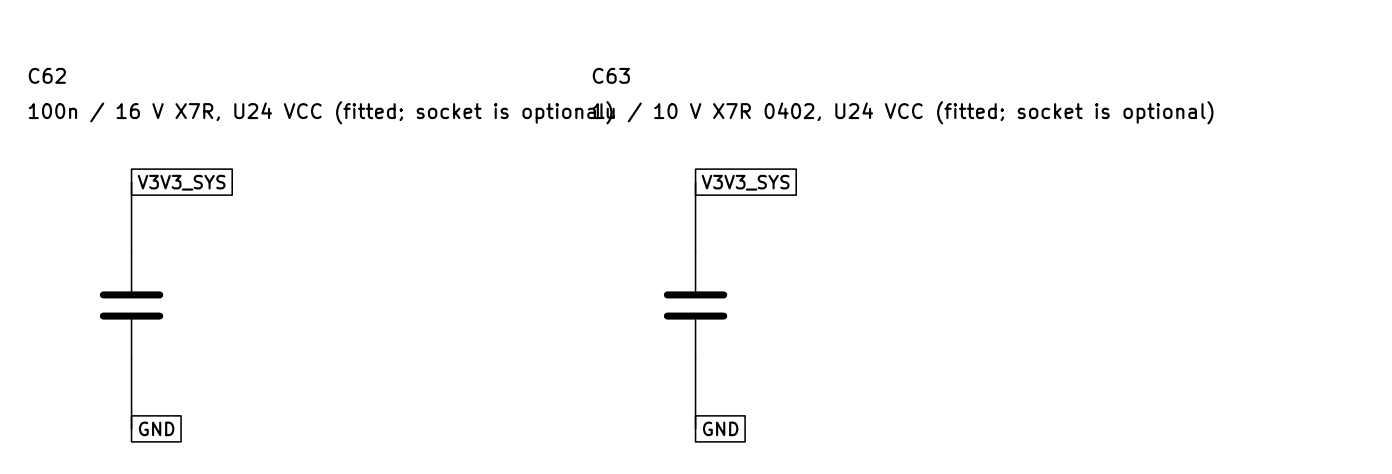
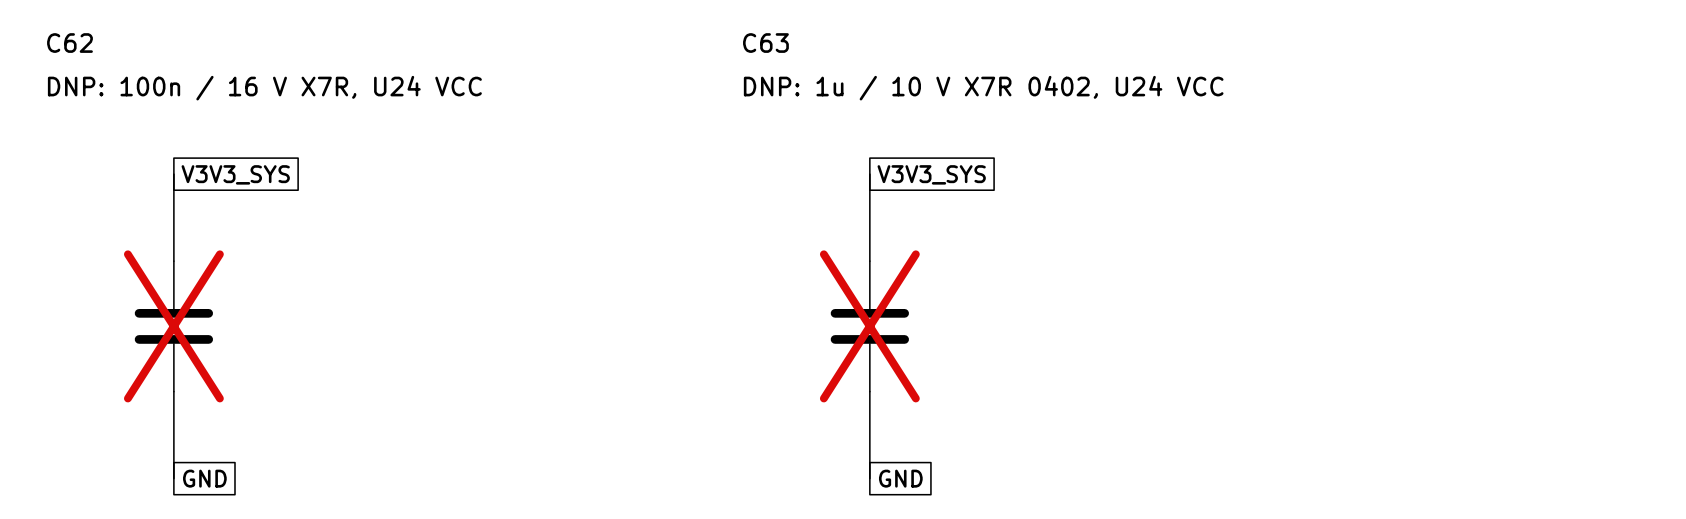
C62 value: 100n / 16 V X7R, U24 VCC (fitted; socket is optional) (320, 112) -> DNP: 100n / 16 V X7R, U24 VCC (264, 88)
C63 value: 1u / 10 V X7R 0402, U24 VCC (fitted; socket is optional) (903, 112) -> DNP: 1u / 10 V X7R 0402, U24 VCC (983, 88)
C62 do-not-place cross: none -> (173, 326)
C63 do-not-place cross: none -> (869, 326)

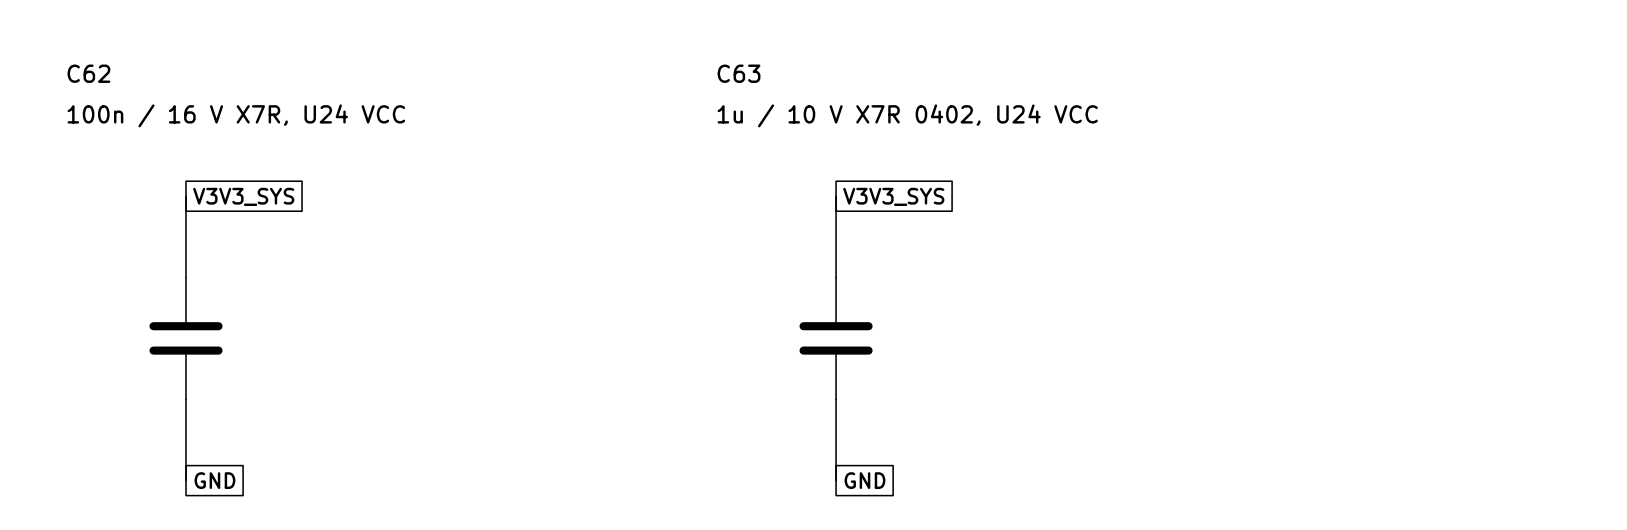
C62 value: DNP: 100n / 16 V X7R, U24 VCC (264, 88) -> 100n / 16 V X7R, U24 VCC (236, 115)
C63 value: DNP: 1u / 10 V X7R 0402, U24 VCC (983, 88) -> 1u / 10 V X7R 0402, U24 VCC (907, 115)
C62 do-not-place cross: (173, 326) -> none
C63 do-not-place cross: (869, 326) -> none

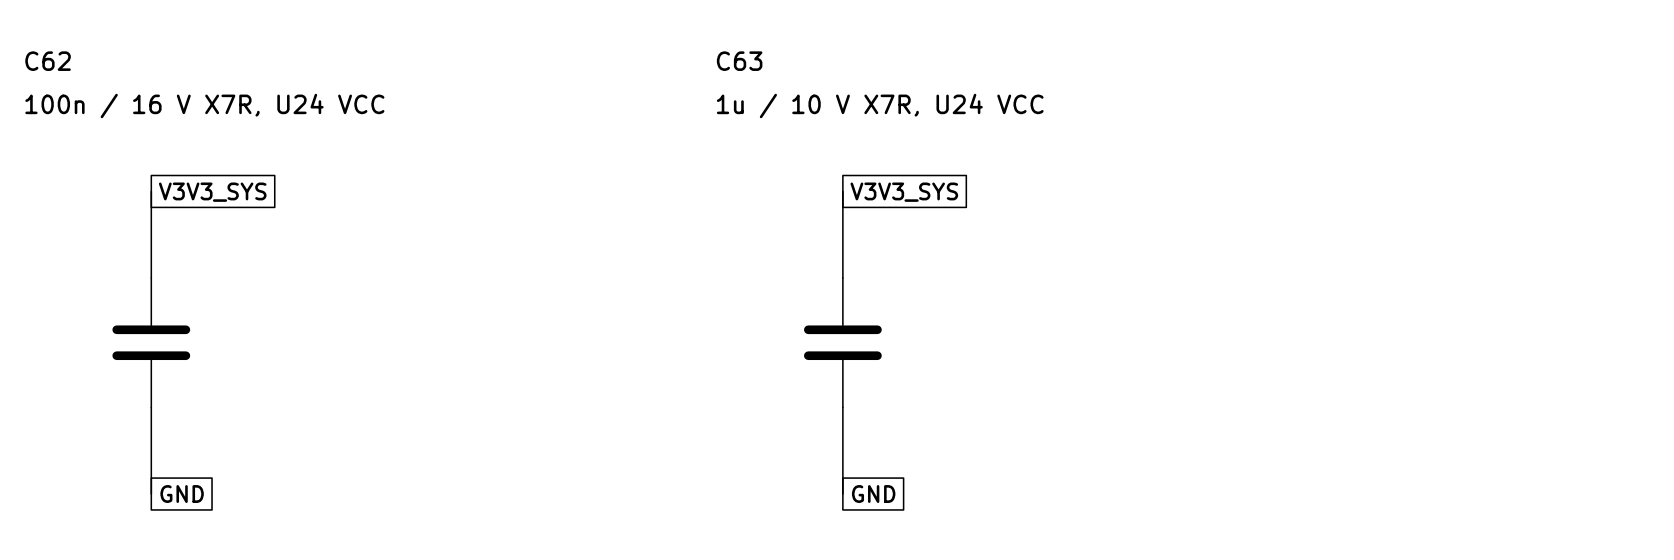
C63 value: 1u / 10 V X7R 0402, U24 VCC (907, 115) -> 1u / 10 V X7R, U24 VCC (880, 105)

